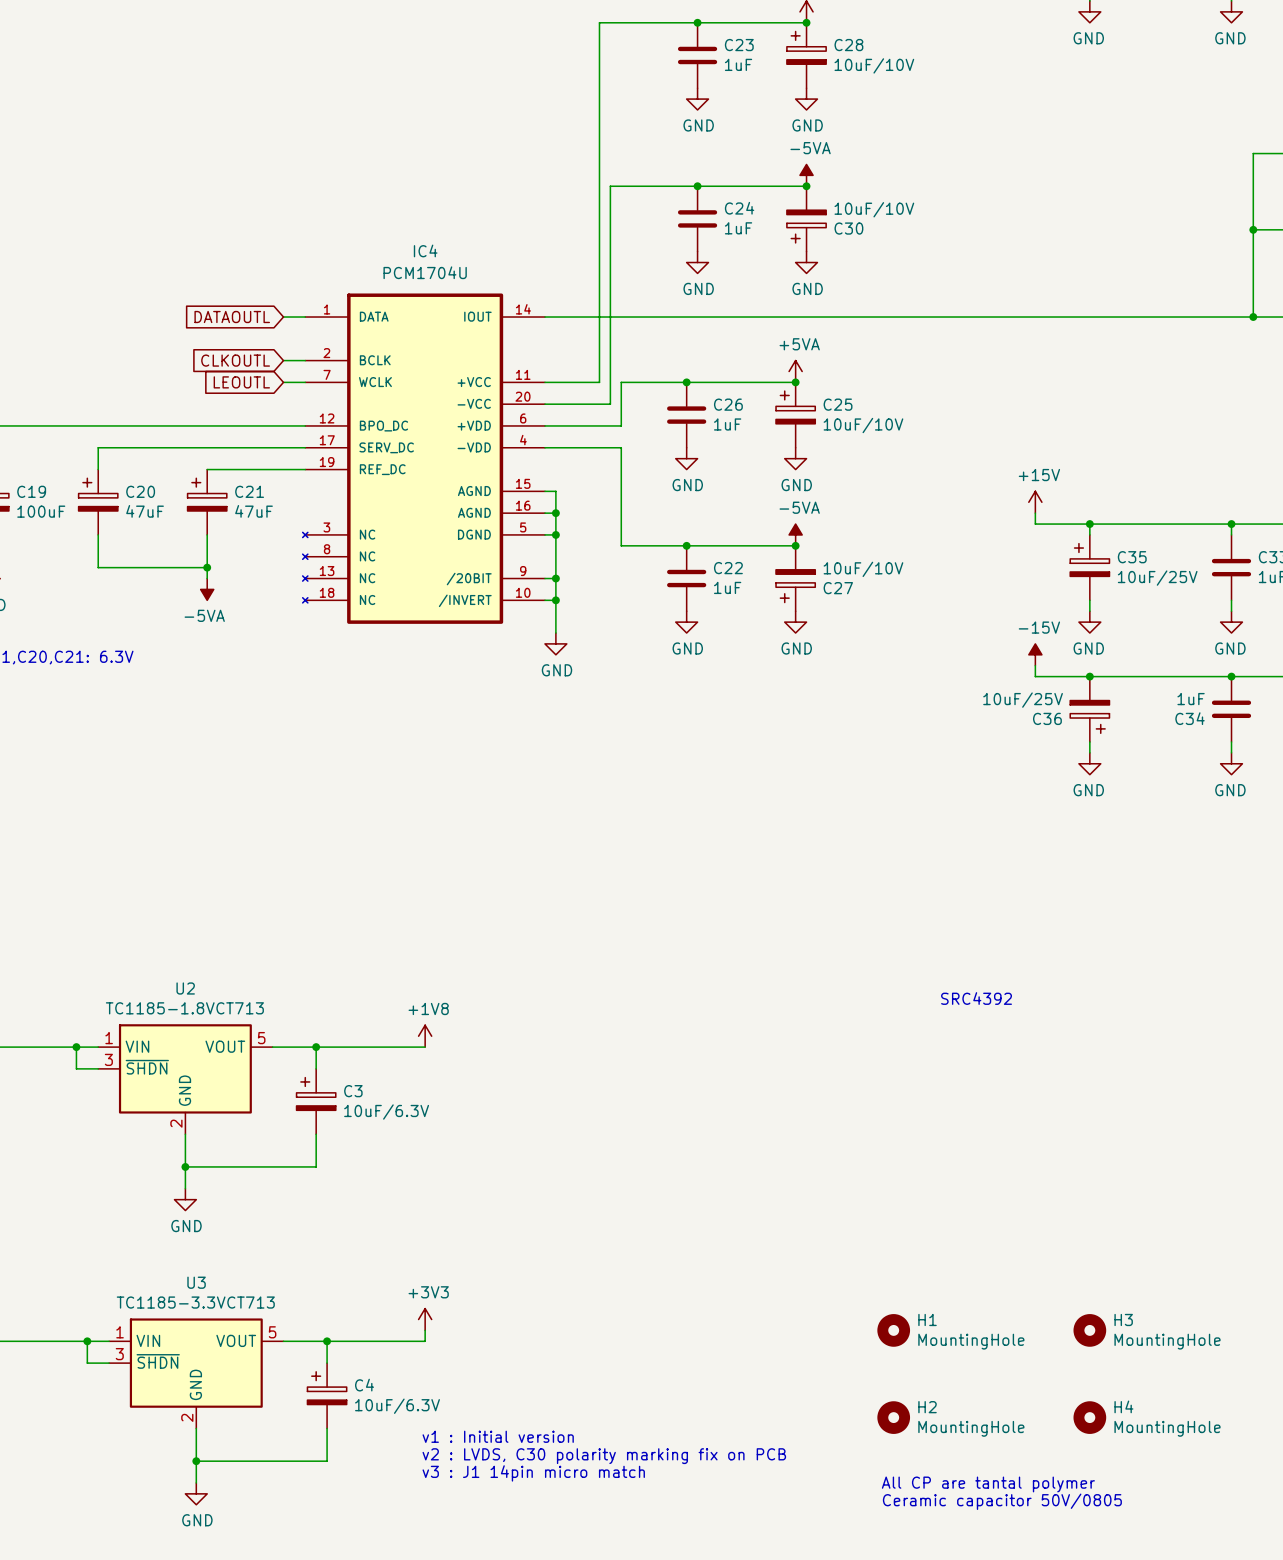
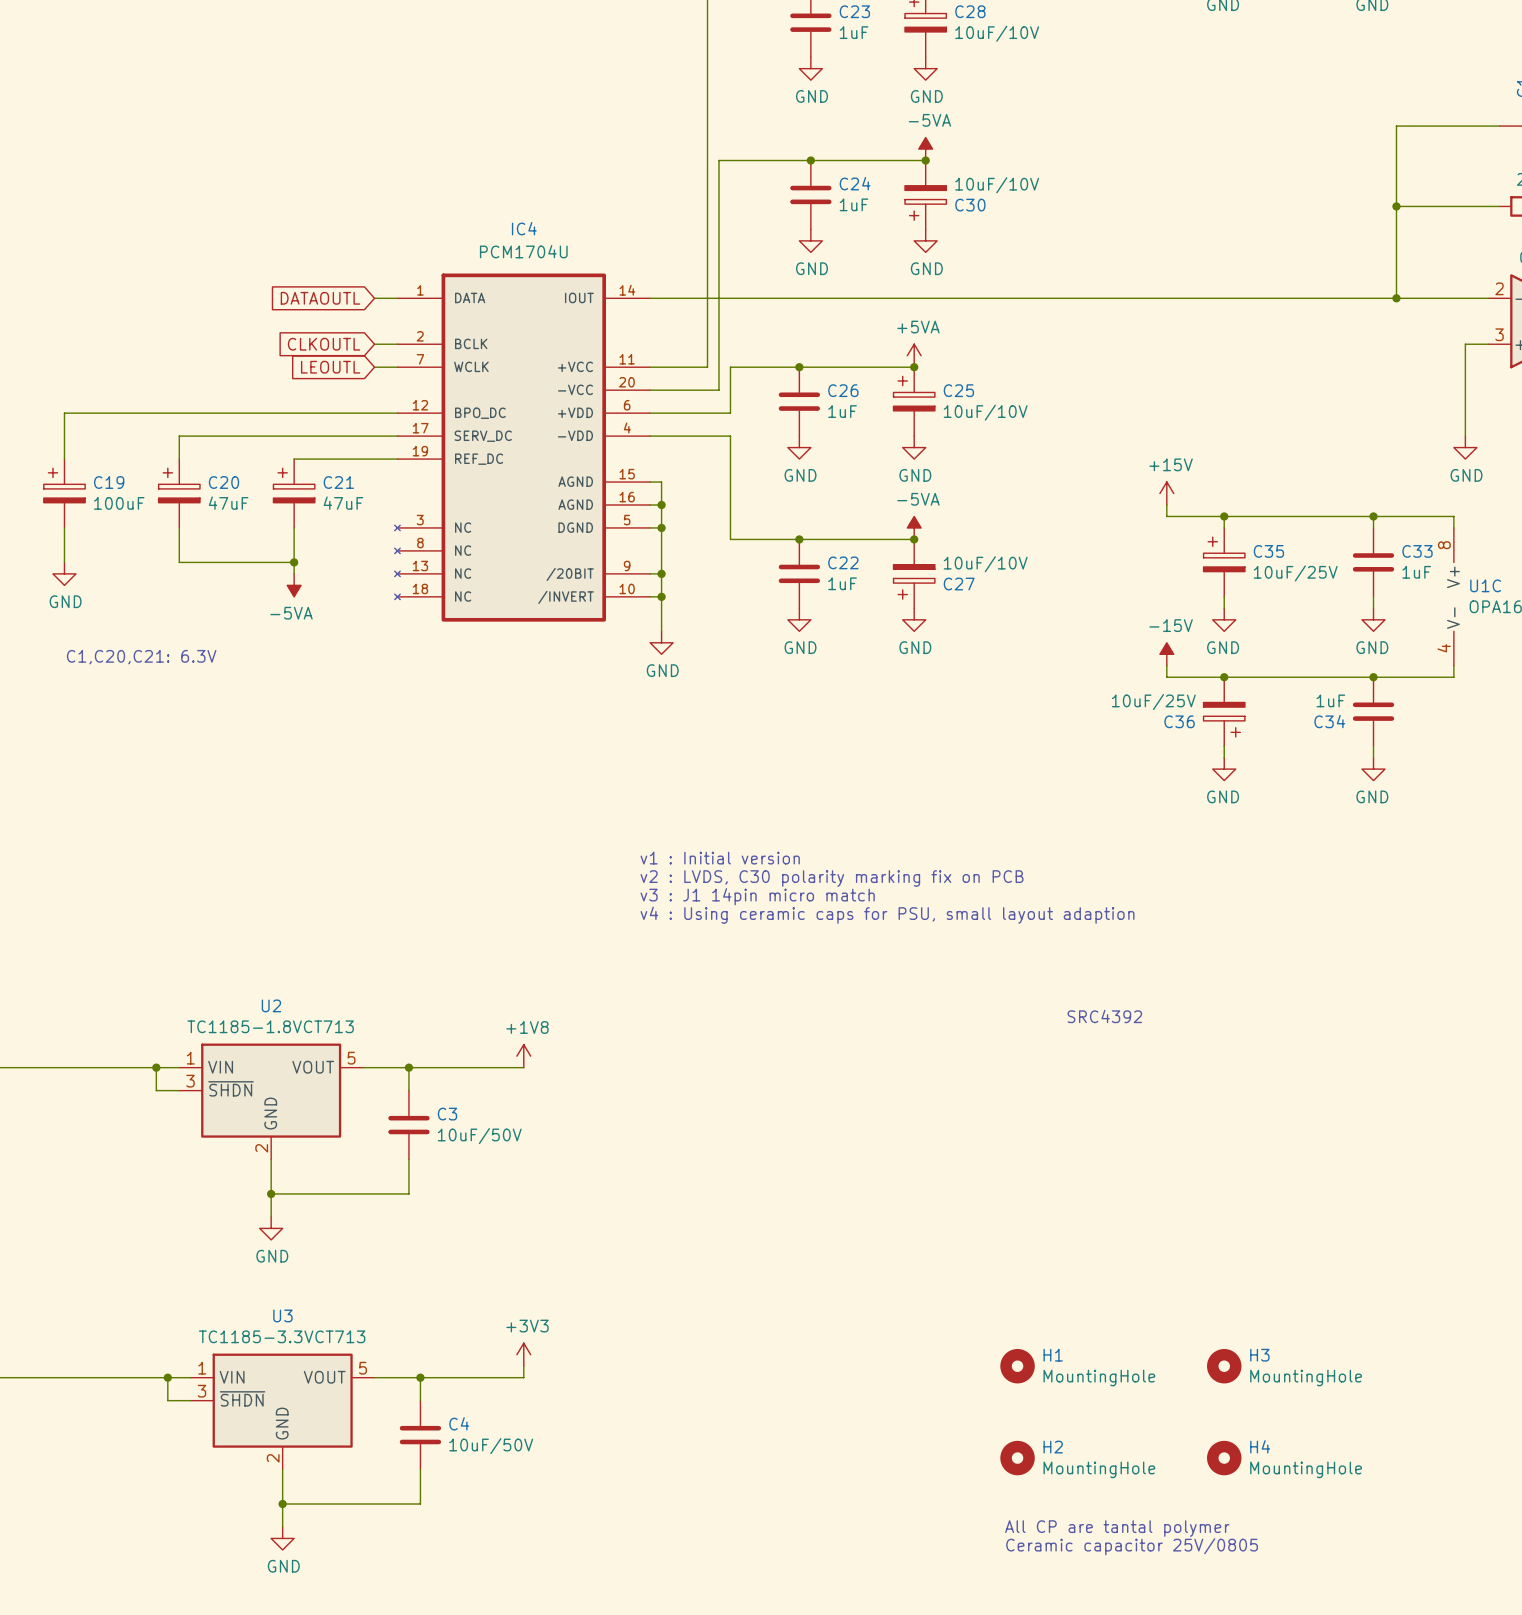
text: none -> v1 : Initial version (720, 858)
text: none -> v2 : LVDS, C30 polarity marking fix on PCB (831, 878)
text: none -> v3 : J1 14pin micro match (757, 896)
text: none -> v4 : Using ceramic caps for PSU, small layout adaption (887, 915)
C3 symbol: [296, 1068, 336, 1135] -> [388, 1090, 430, 1160]
C3 value: 10uF/6.3V (386, 1112) -> 10uF/50V (479, 1136)
C4 symbol: [307, 1363, 347, 1429] -> [399, 1400, 442, 1470]
C4 value: 10uF/6.3V (397, 1406) -> 10uF/50V (491, 1446)
text: v1 : Initial version (498, 1436) -> none
text: v2 : LVDS, C30 polarity marking fix on PCB (604, 1456) -> none
text: v3 : J1 14pin micro match (533, 1473) -> none
text: Ceramic capacitor 50V/0805 (1002, 1501) -> Ceramic capacitor 25V/0805 (1132, 1546)

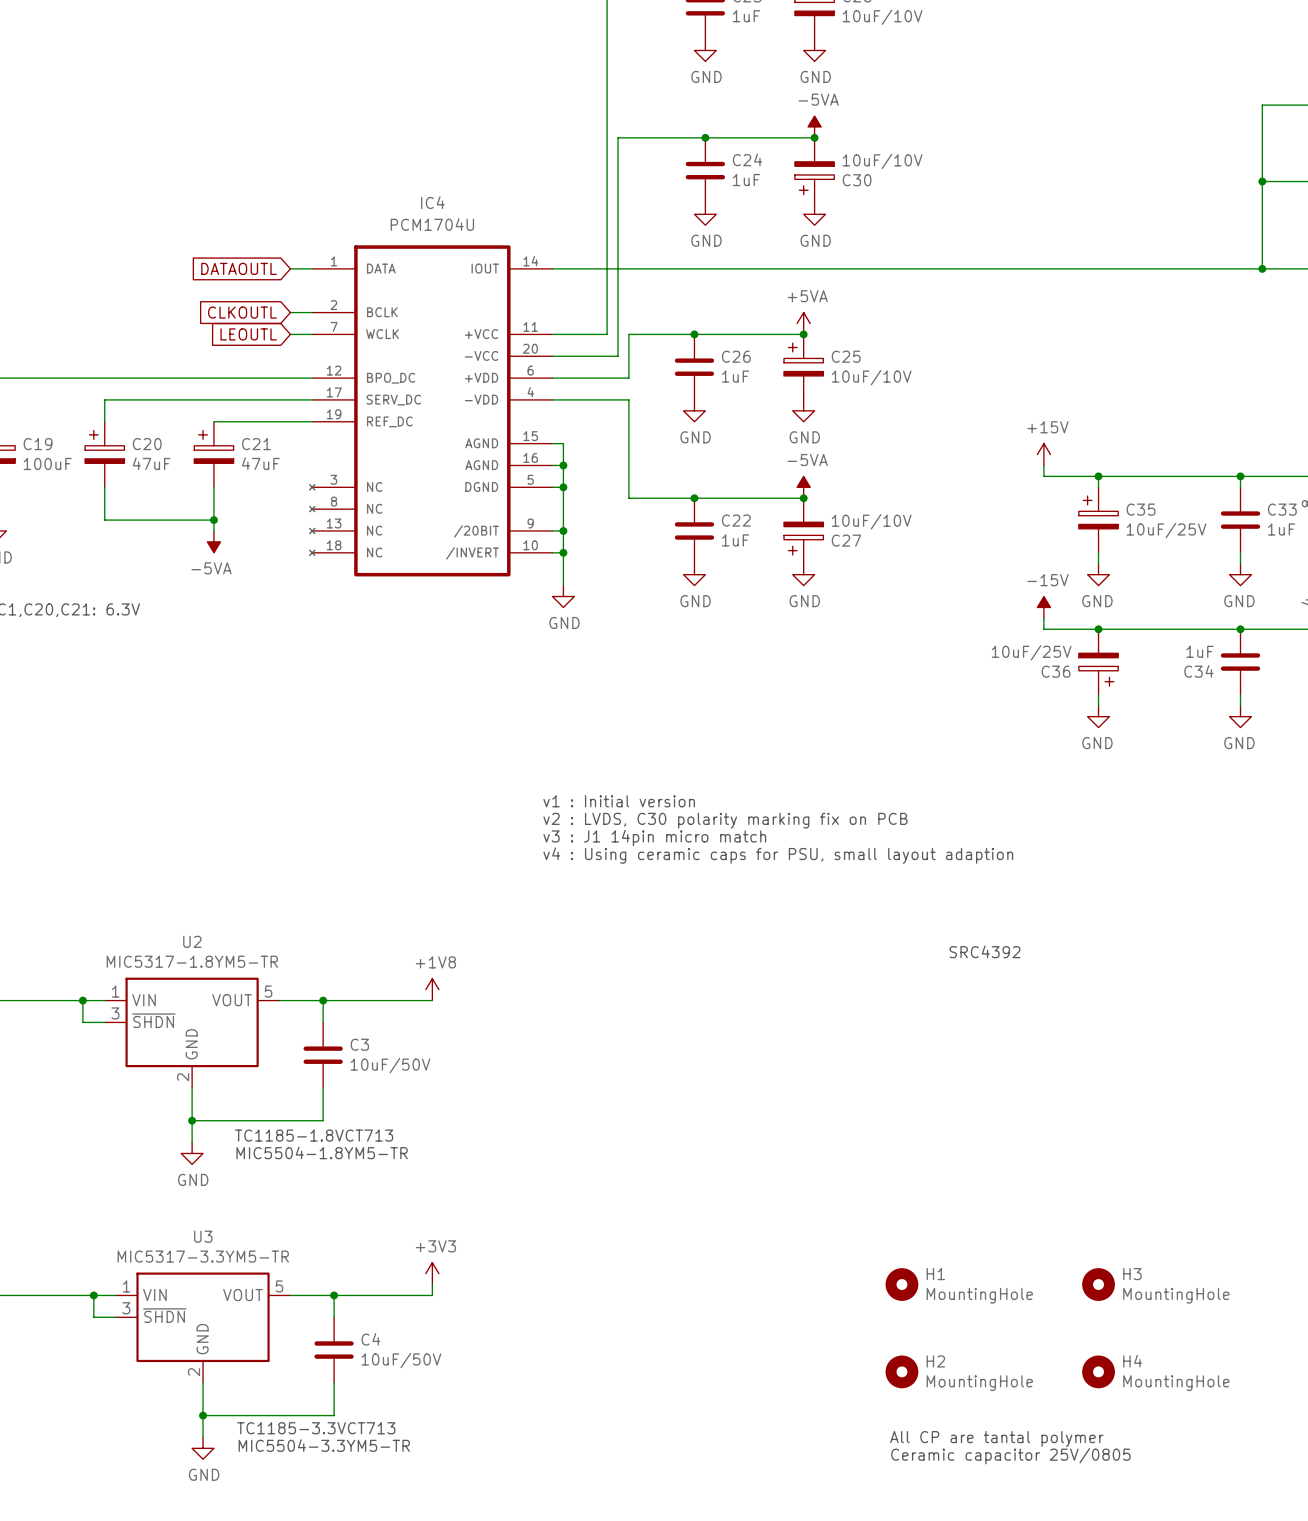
U2 value: TC1185-1.8VCT713 (270, 1026) -> MIC5317-1.8YM5-TR (192, 961)
text: none -> TC1185-1.8VCT713 (314, 1135)
text: none -> MIC5504-1.8YM5-TR (322, 1152)
U3 value: TC1185-3.3VCT713 (282, 1336) -> MIC5317-3.3YM5-TR (203, 1256)
text: none -> TC1185-3.3VCT713 (316, 1428)
text: none -> MIC5504-3.3YM5-TR (324, 1445)

